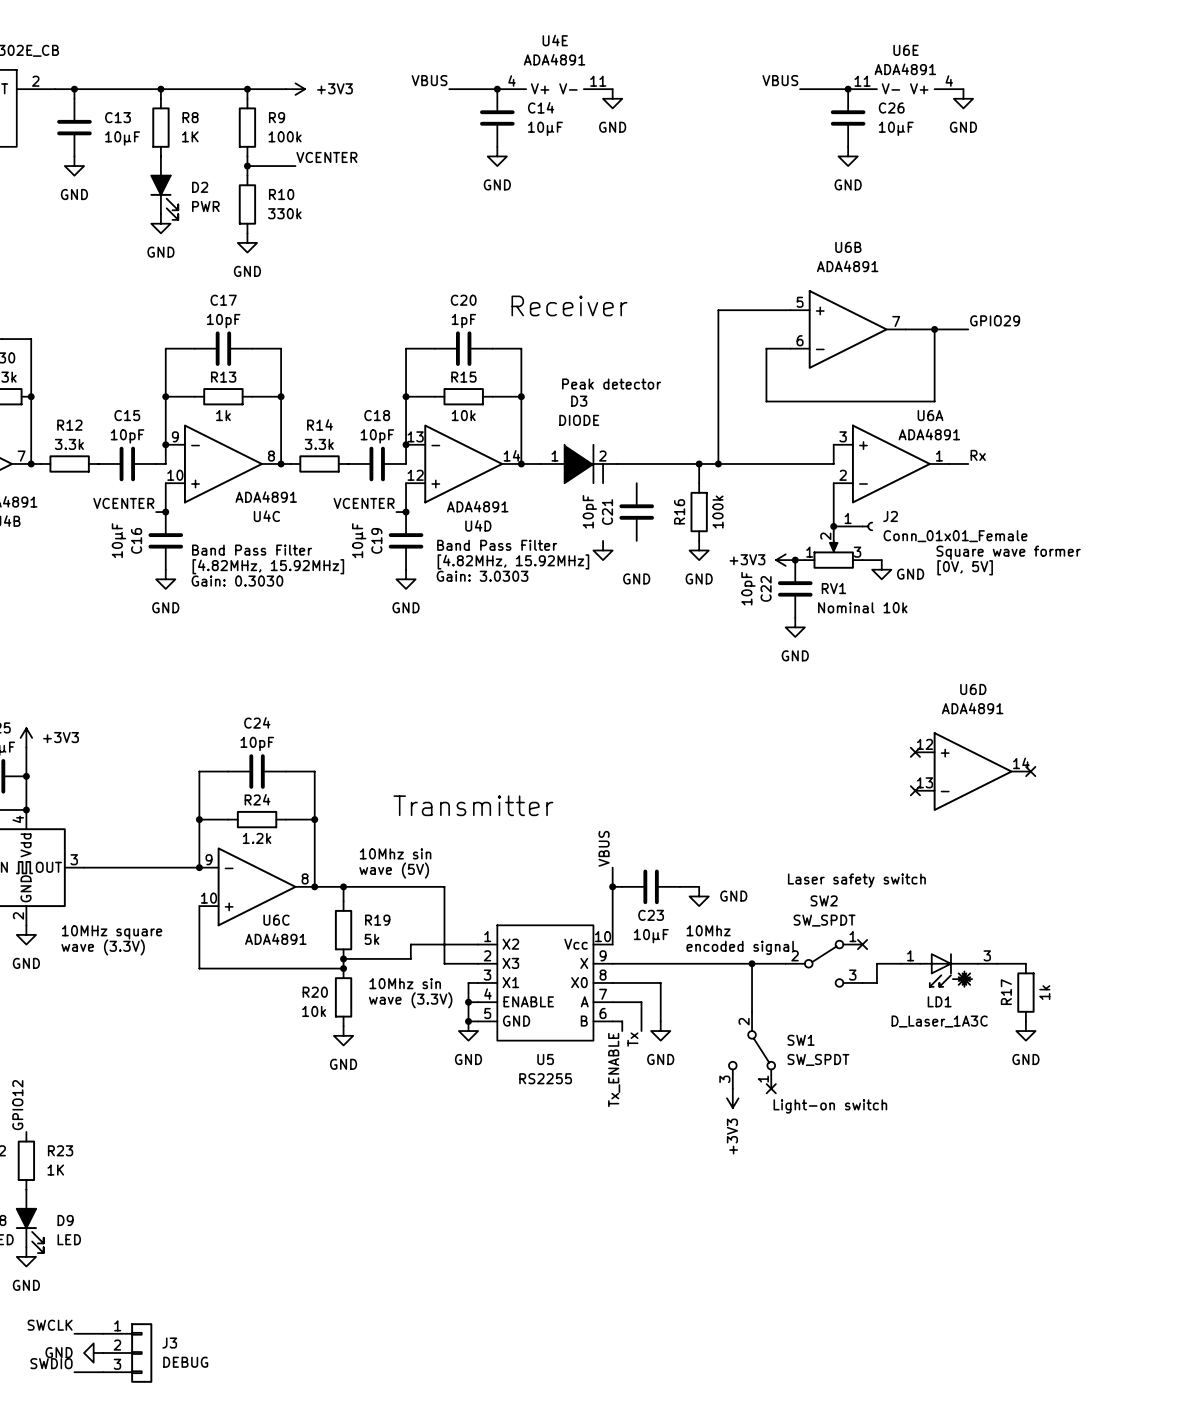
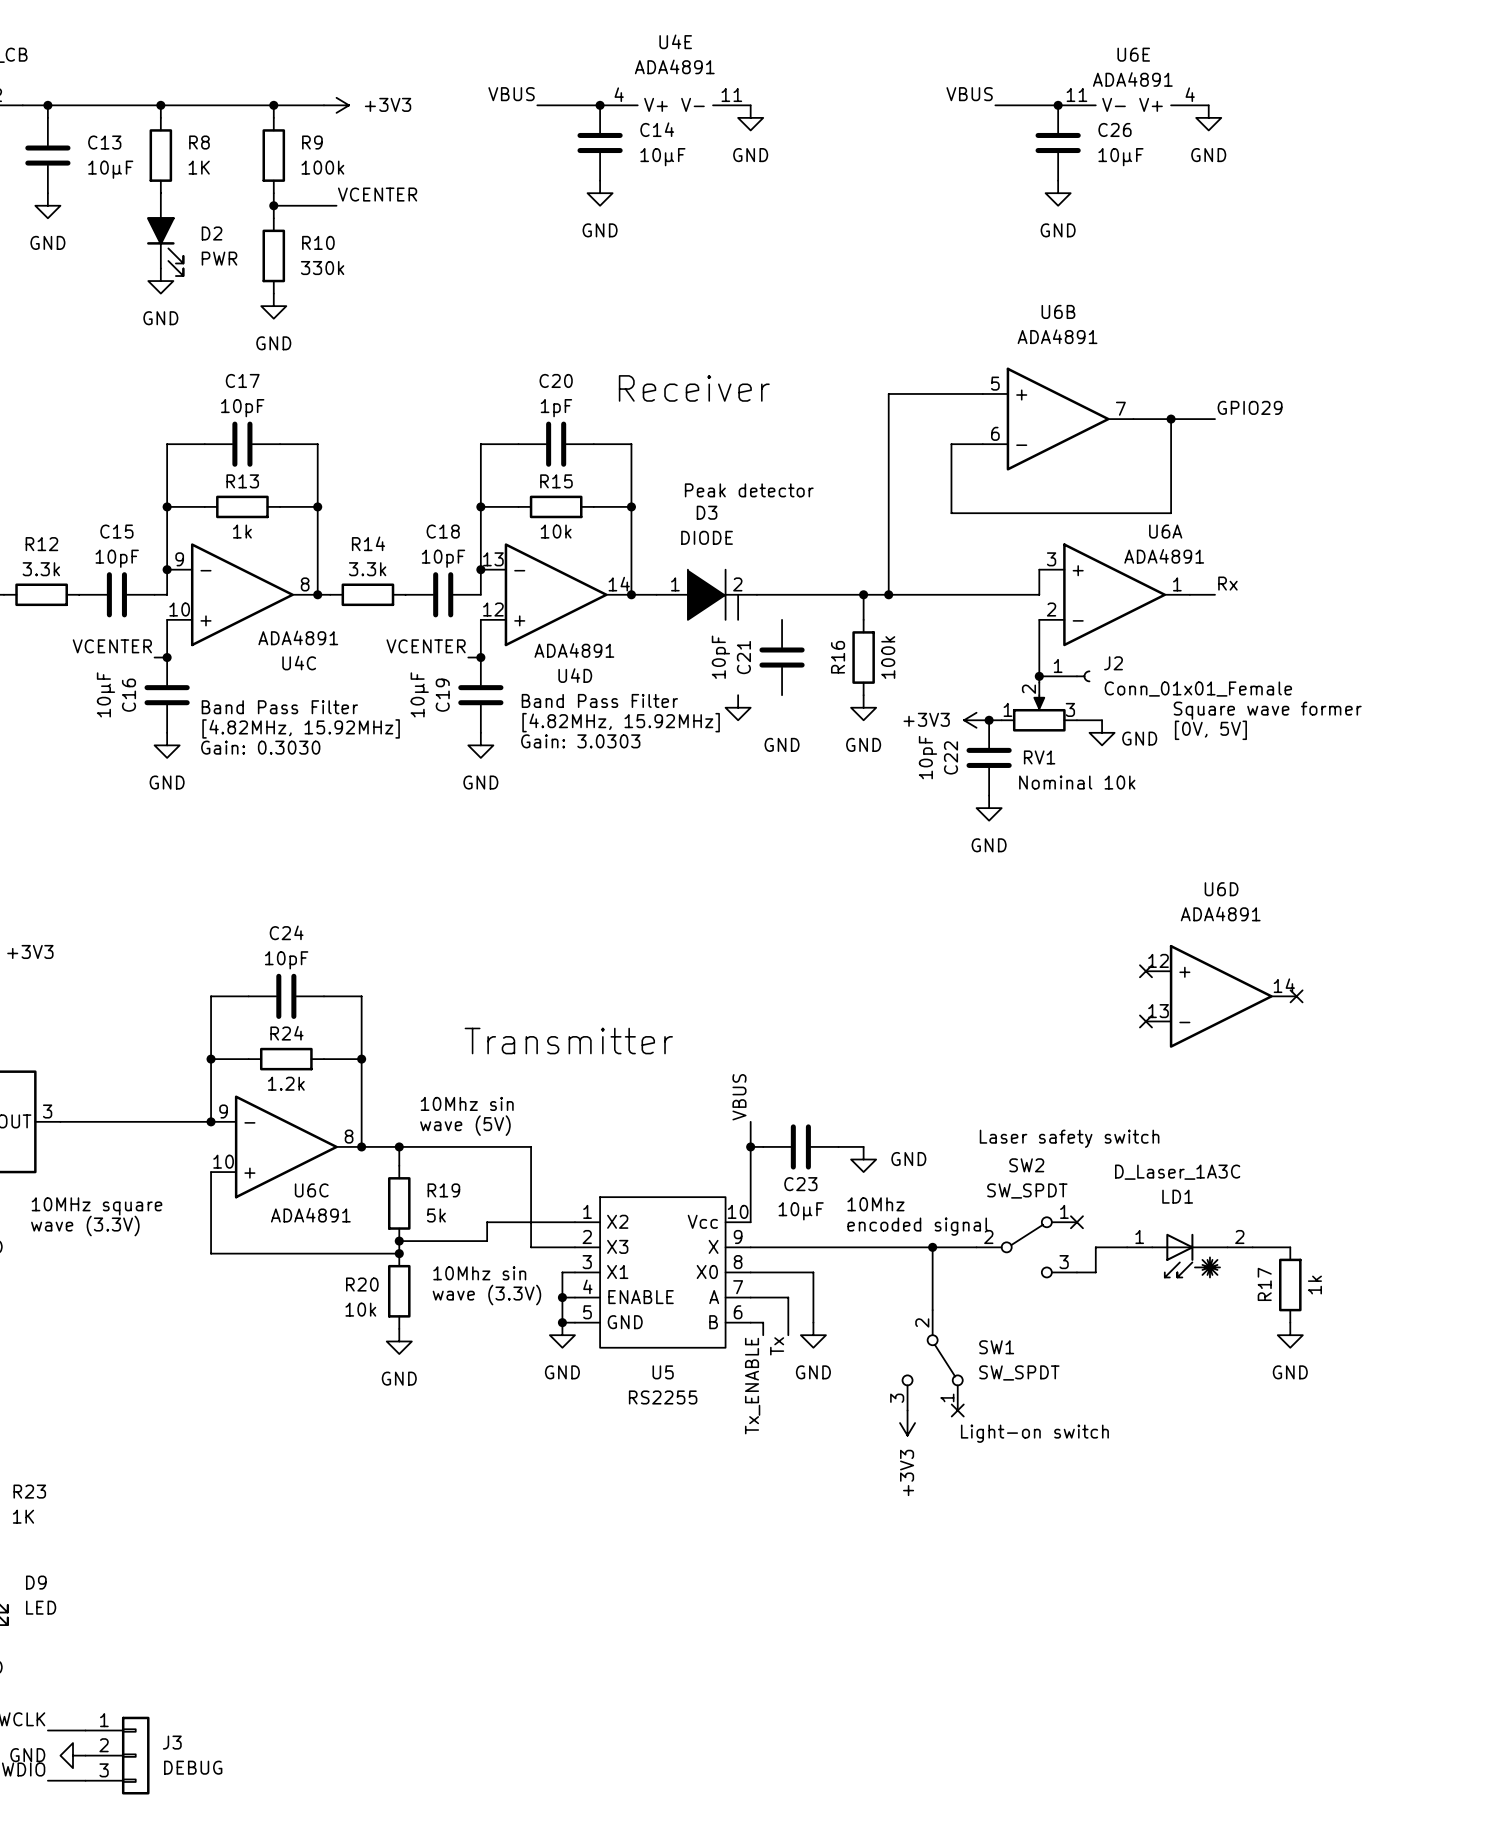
LD1 pin number: 3 (987, 955) -> 2 (1239, 1237)
LD1 name position: LD1 (939, 1001) -> LD1 (1177, 1196)
LD1 value position: D_Laser_1A3C (939, 1021) -> D_Laser_1A3C (1177, 1172)

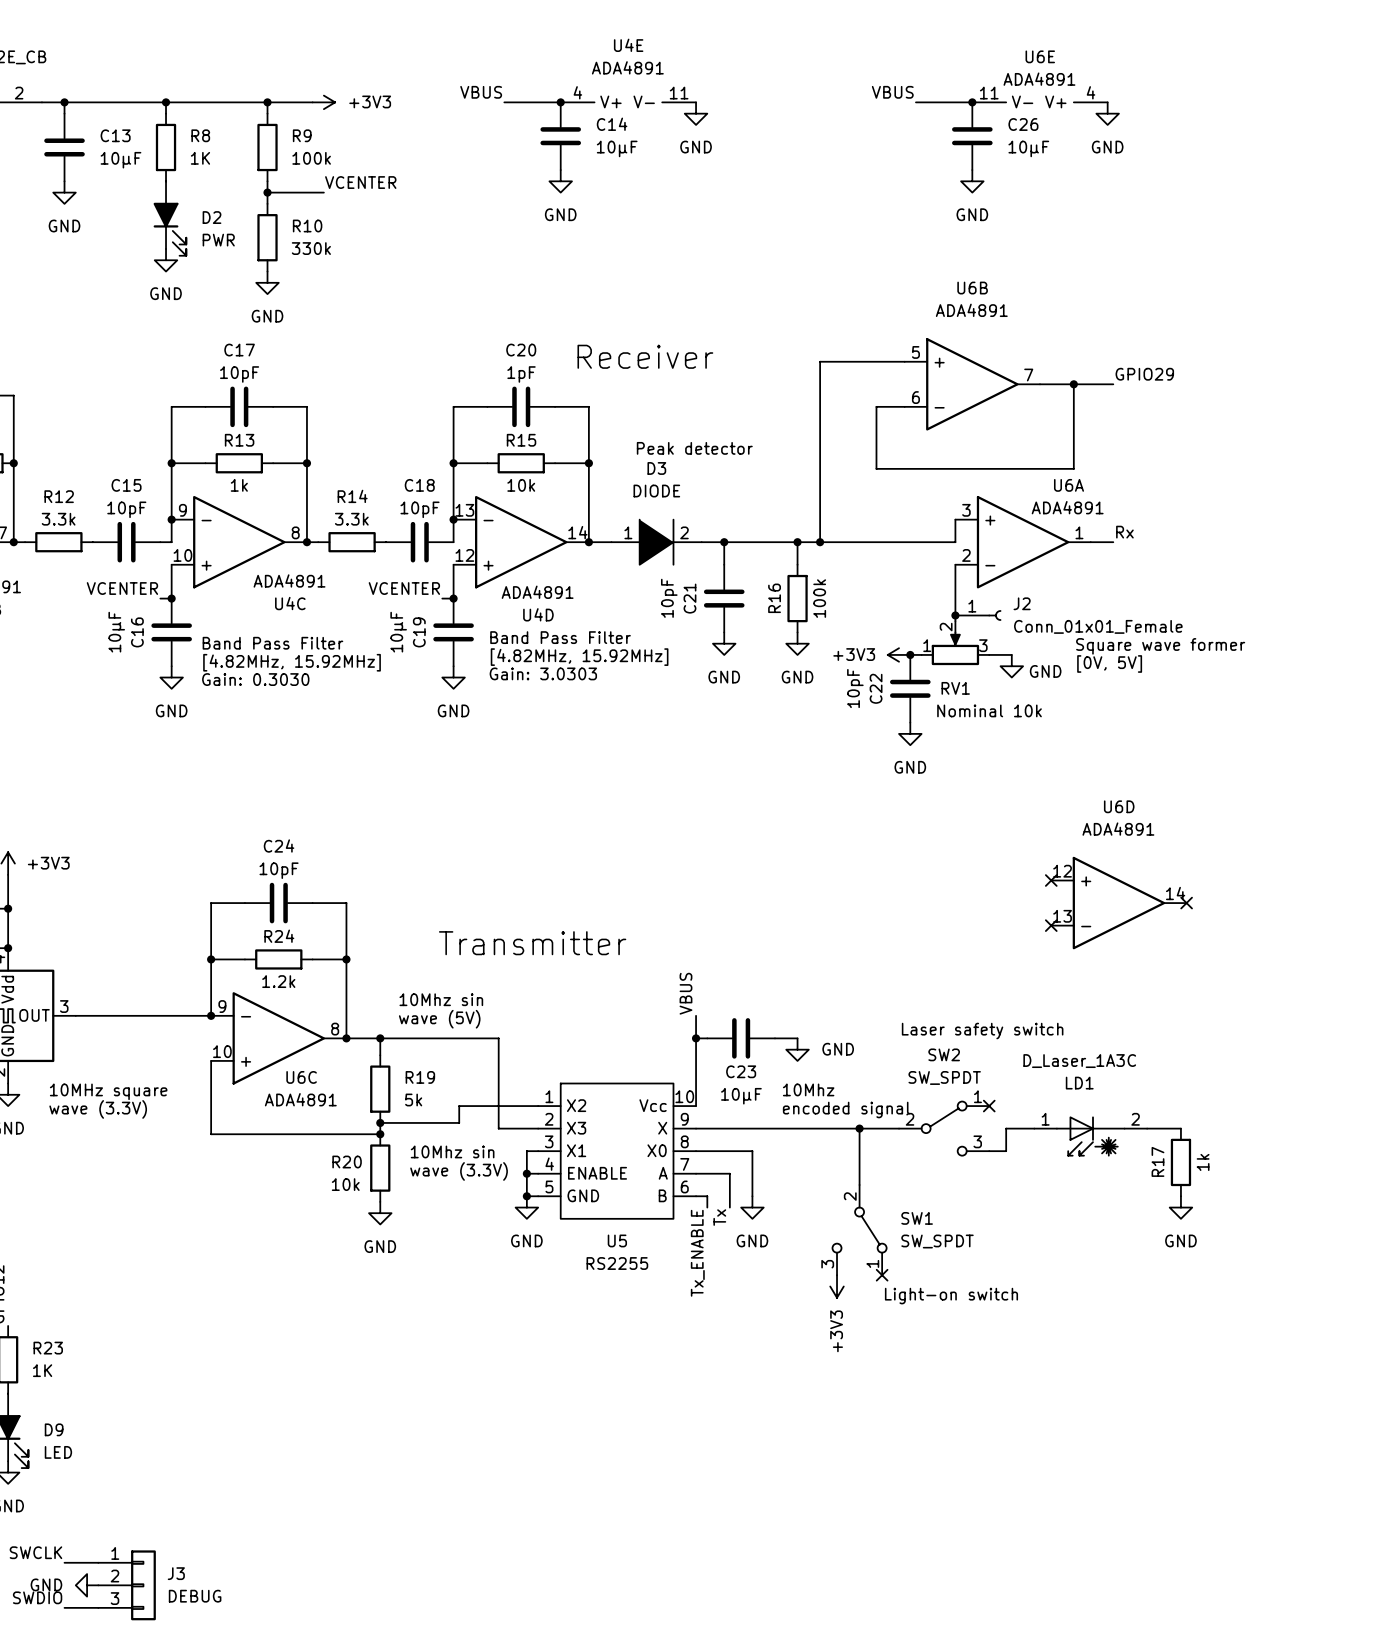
wire: (738, 594) (738, 619) -> (724, 542) (724, 564)
junction: none -> (724, 542)
power symbol position: GND (738, 707) -> GND (724, 643)

